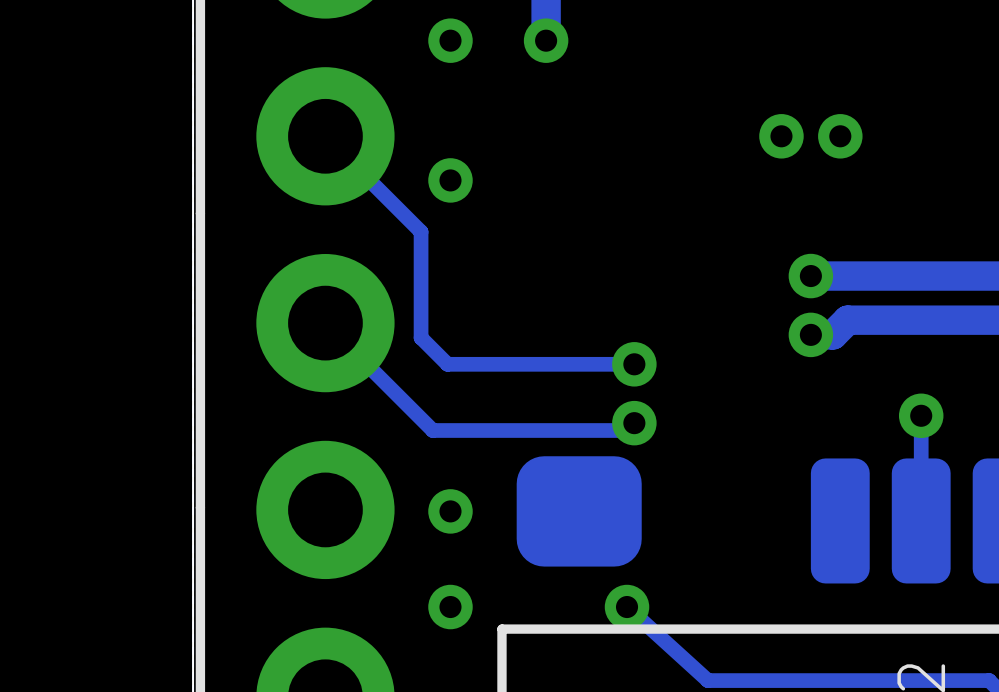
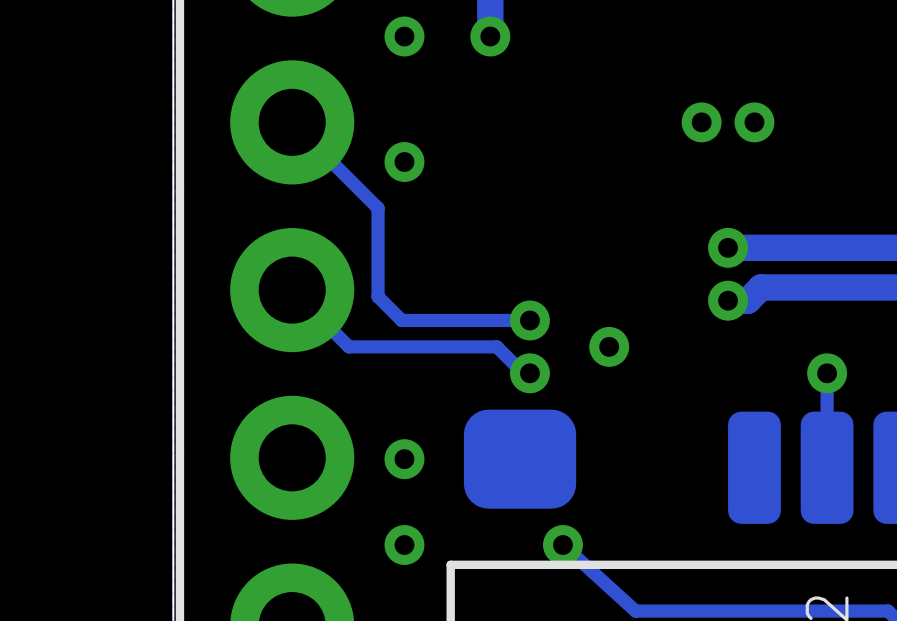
track: (421, 330) (421, 337) (447, 364) (634, 364) -> (378, 296) (401, 320) (529, 320)
via: none -> (529, 320)
via: (634, 364) -> none
track: (388, 386) (432, 430) (627, 430) (634, 423) -> (349, 346) (496, 346) (523, 373) (529, 373)
via: none -> (609, 346)
via: none -> (529, 373)
via: (634, 423) -> none

